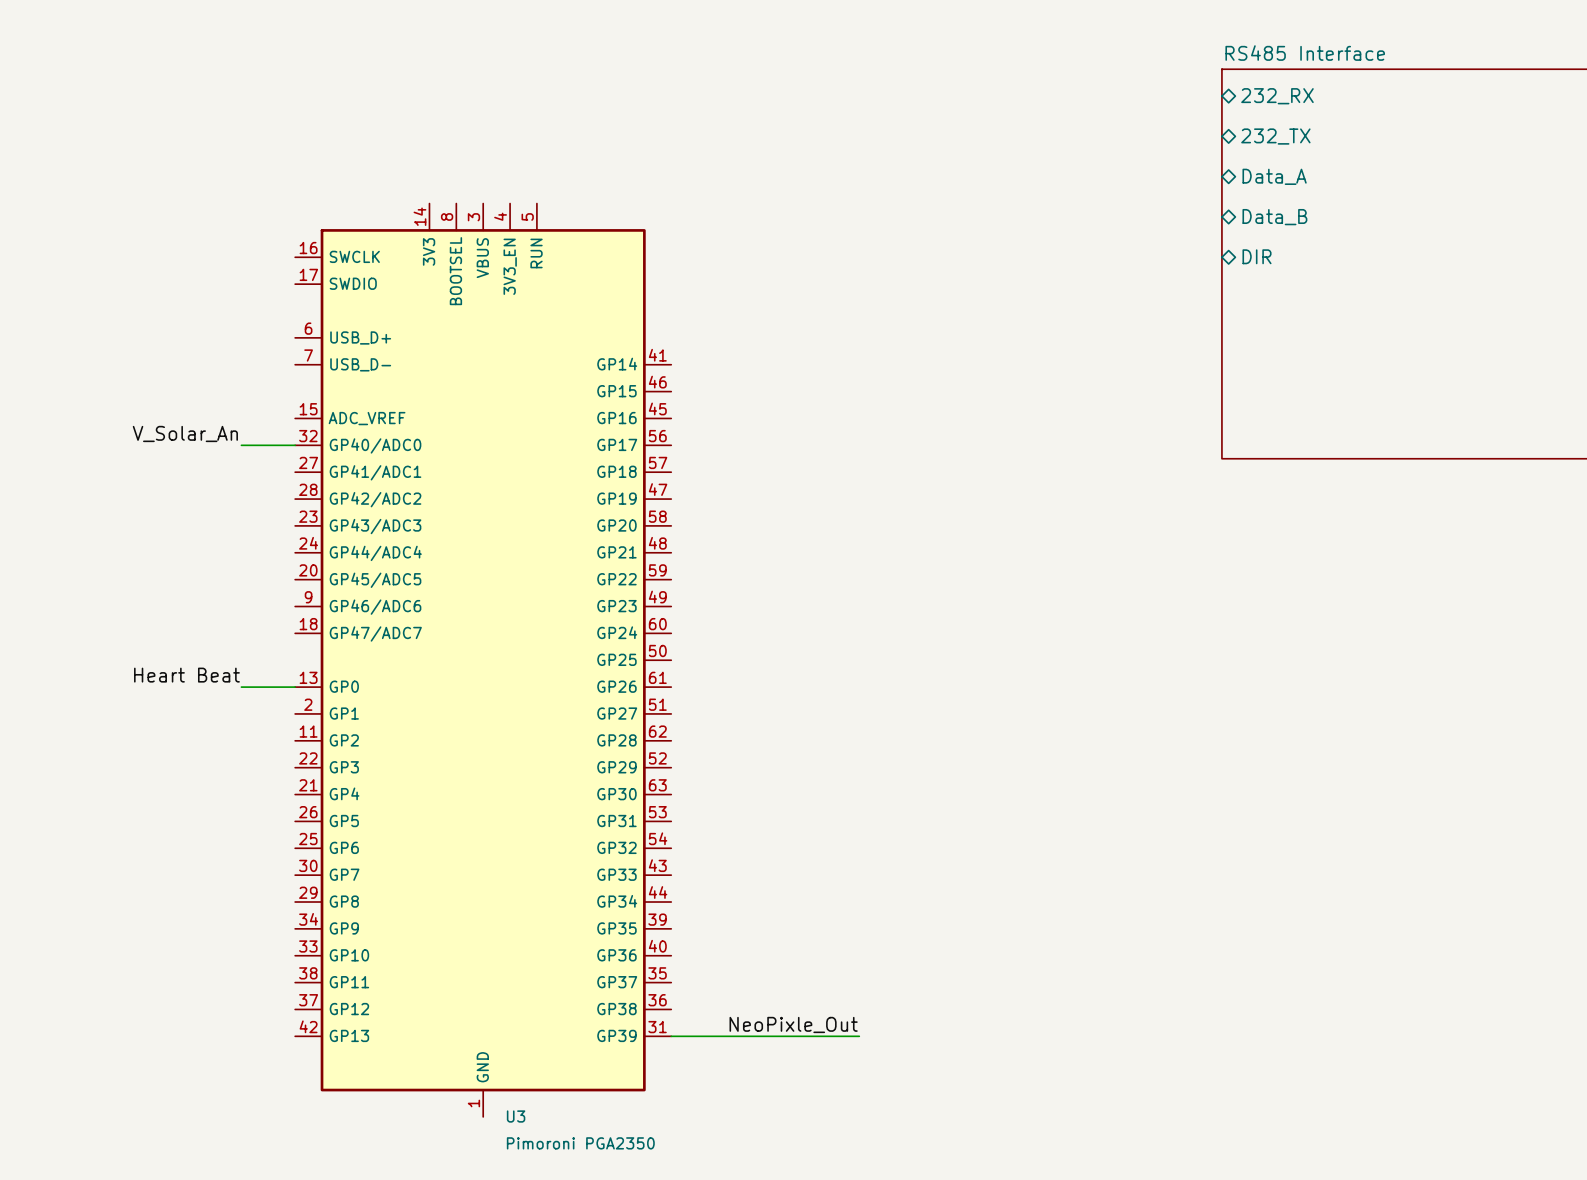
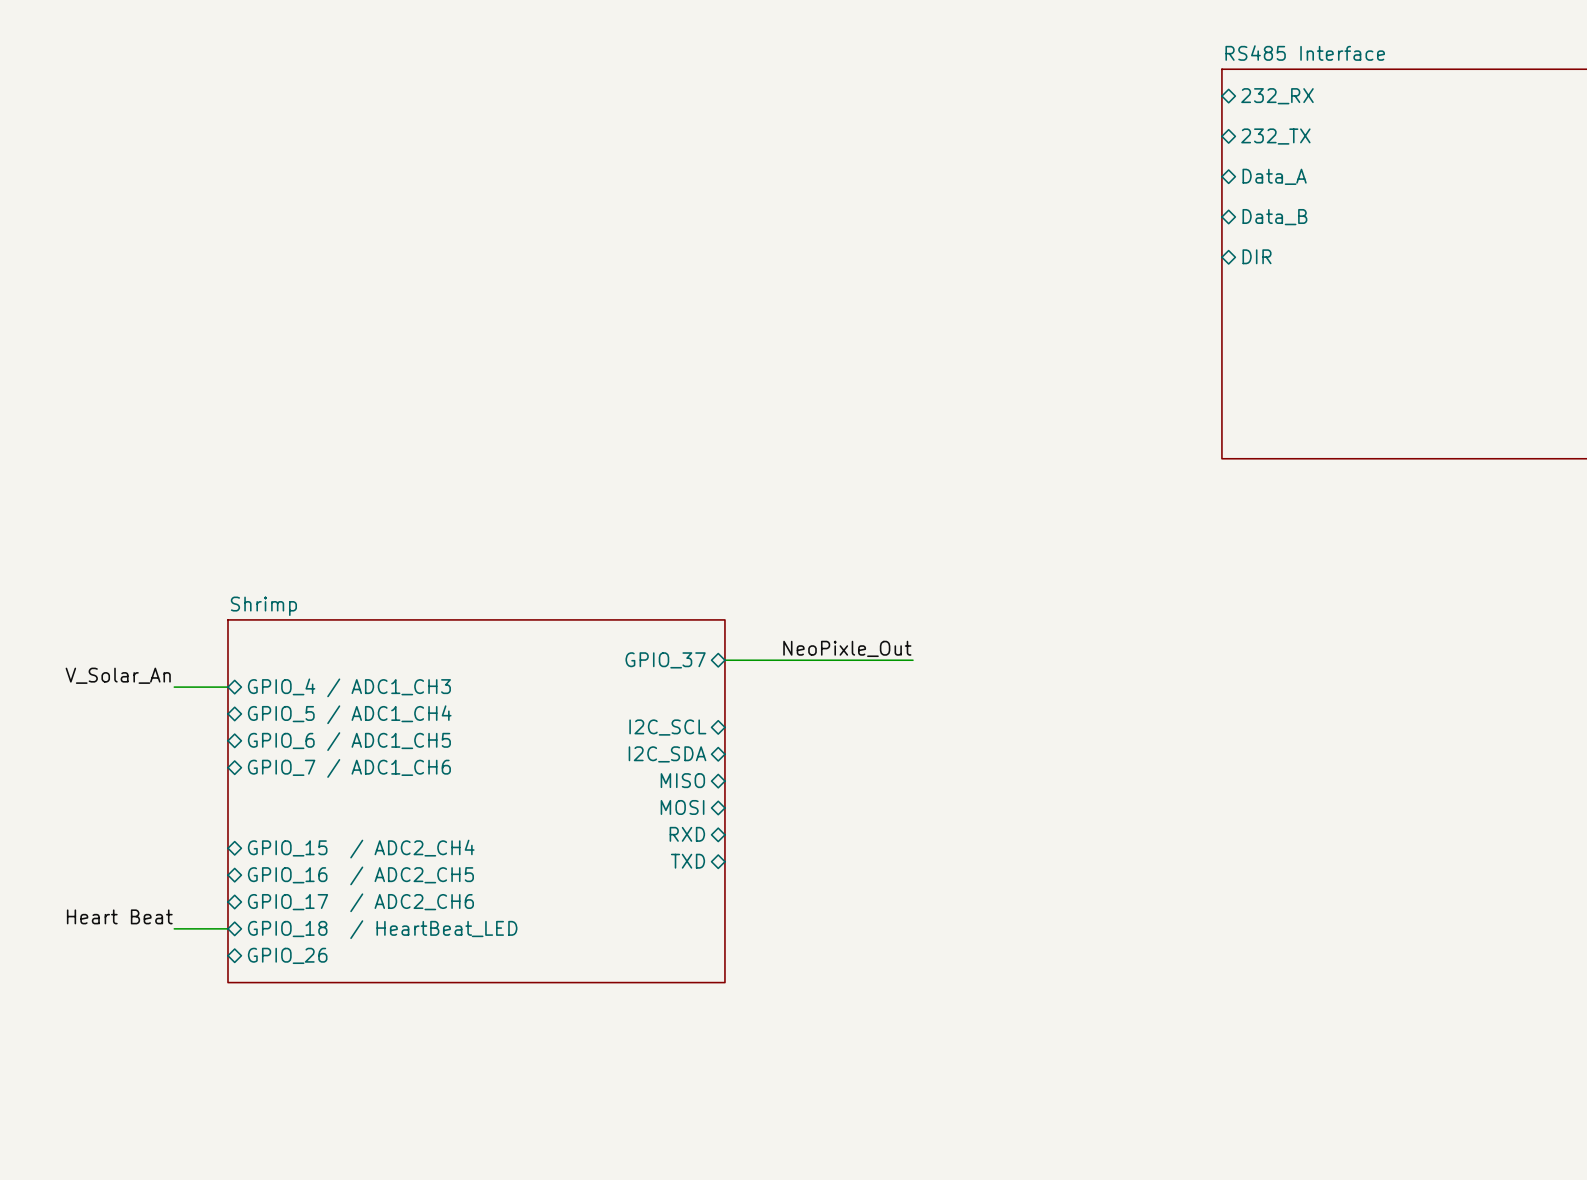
label position: V_Solar_An (185, 433) -> V_Solar_An (118, 675)
wire: (241, 445) (295, 445) -> (174, 687) (227, 687)
label: none -> NeoPixle_Out (847, 648)
U3: Pimoroni PGA2350 (483, 660) -> none
sheet pin: none -> GPIO_37 (665, 660)
wire: none -> (724, 660) (913, 660)
label position: Heart Beat (186, 675) -> Heart Beat (119, 916)
wire: (241, 687) (295, 687) -> (174, 928) (227, 928)
sheet pin: none -> GPIO_4 / ADC1_CH3 (349, 687)
sheet pin: none -> GPIO_5 / ADC1_CH4 (349, 714)
sheet pin: none -> I2C_SCL (667, 727)
sheet pin: none -> GPIO_6 / ADC1_CH5 (349, 741)
sheet pin: none -> I2C_SDA (667, 754)
sheet pin: none -> GPIO_7 / ADC1_CH6 (349, 768)
sheet pin: none -> MISO (682, 780)
sheet Shrimp: none -> (476, 801)
sheet pin: none -> MOSI (682, 807)
sheet pin: none -> RXD (687, 834)
sheet pin: none -> GPIO_15 / ADC2_CH4 (361, 849)
sheet pin: none -> TXD (687, 861)
sheet pin: none -> GPIO_16 / ADC2_CH5 (360, 875)
sheet pin: none -> GPIO_17 / ADC2_CH6 (360, 902)
sheet pin: none -> GPIO_18 / HeartBeat_LED (382, 929)
sheet pin: none -> GPIO_26 (287, 955)
label: NeoPixle_Out (793, 1024) -> none
wire: (671, 1036) (859, 1036) -> none

